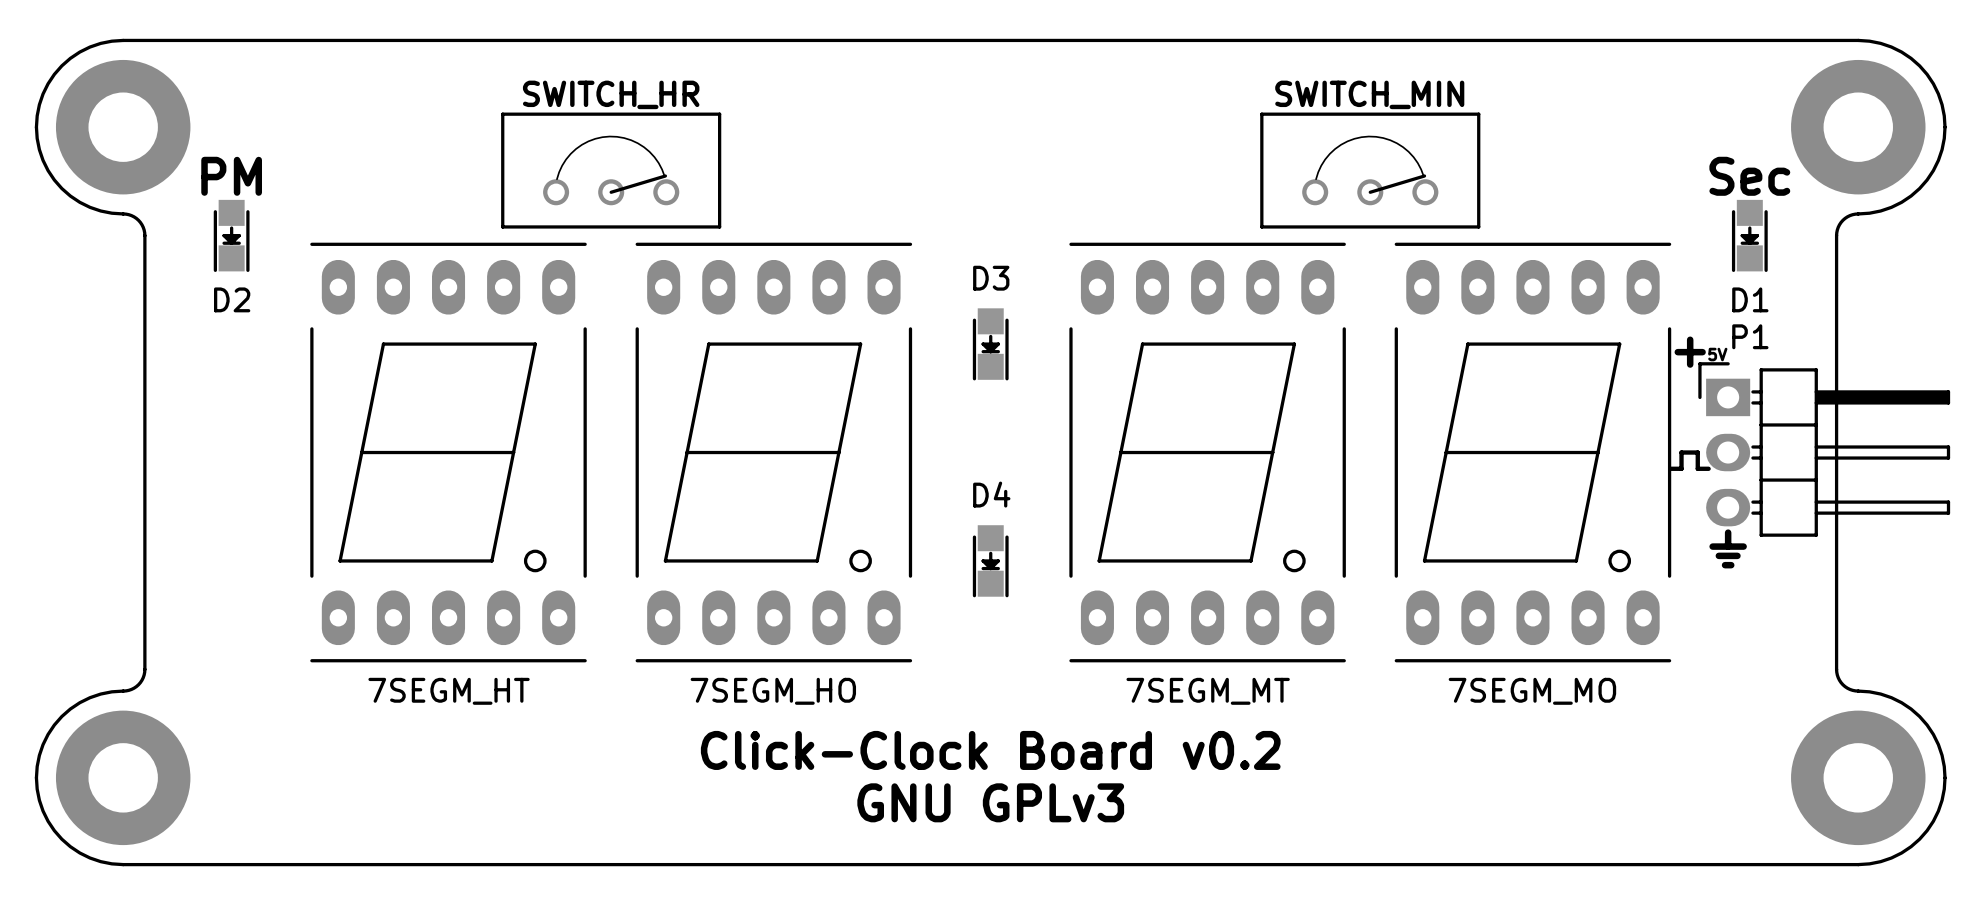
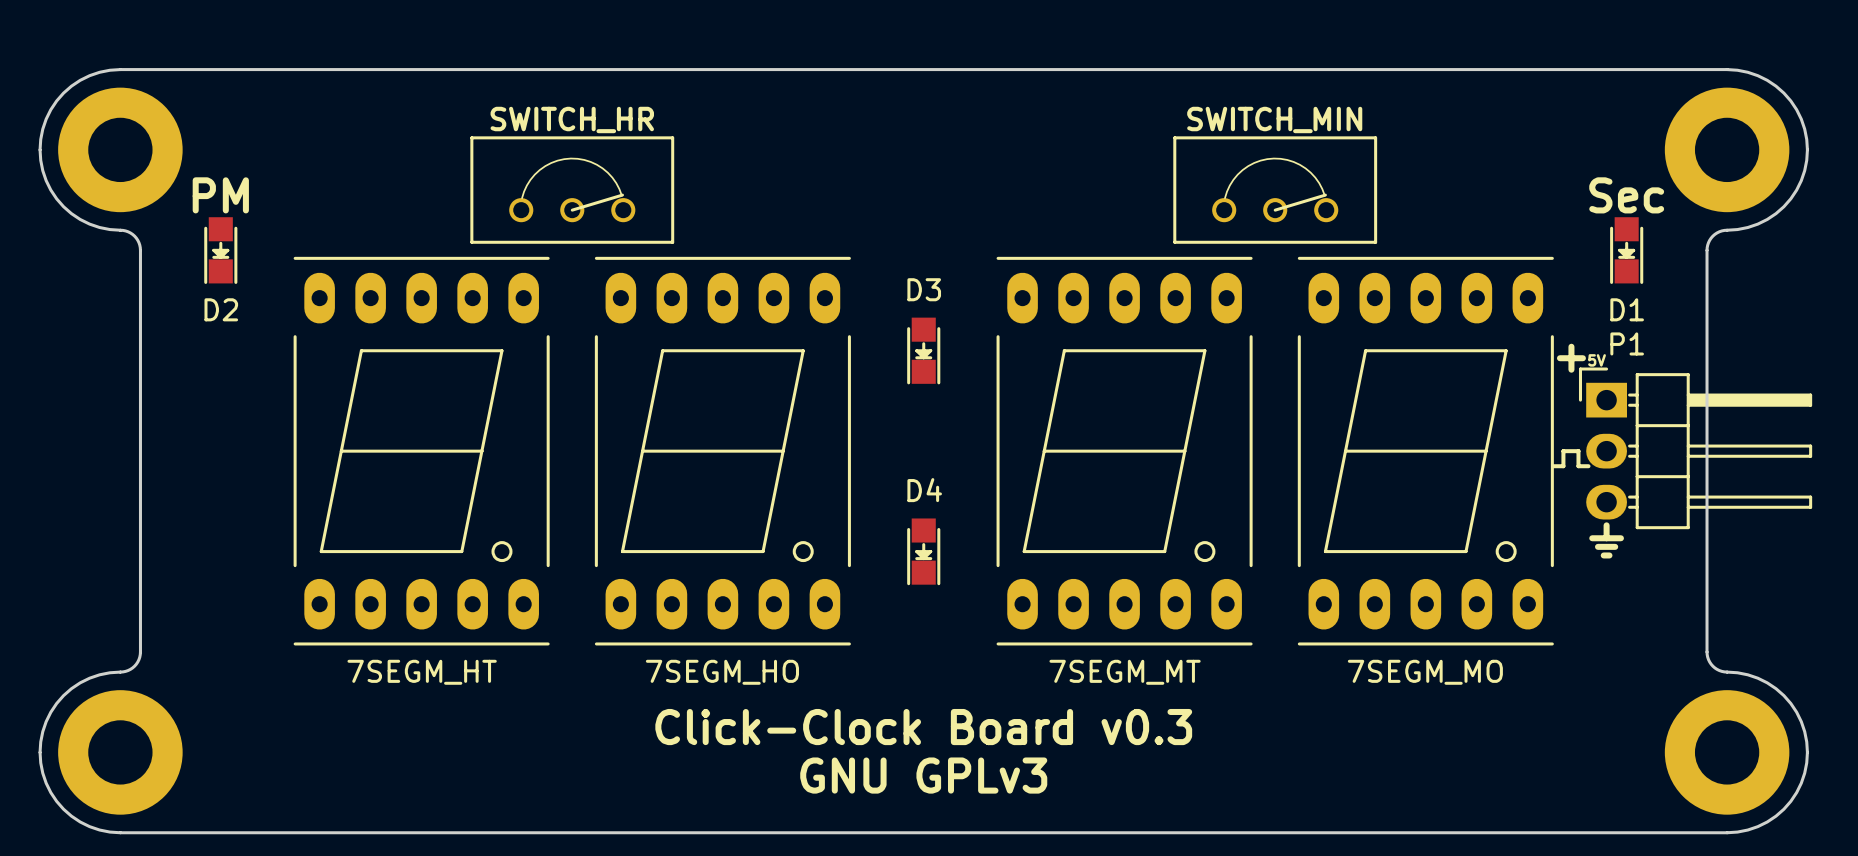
text: Click-Clock Board v0.2 (990, 750) -> Click-Clock Board v0.3 (923, 727)

